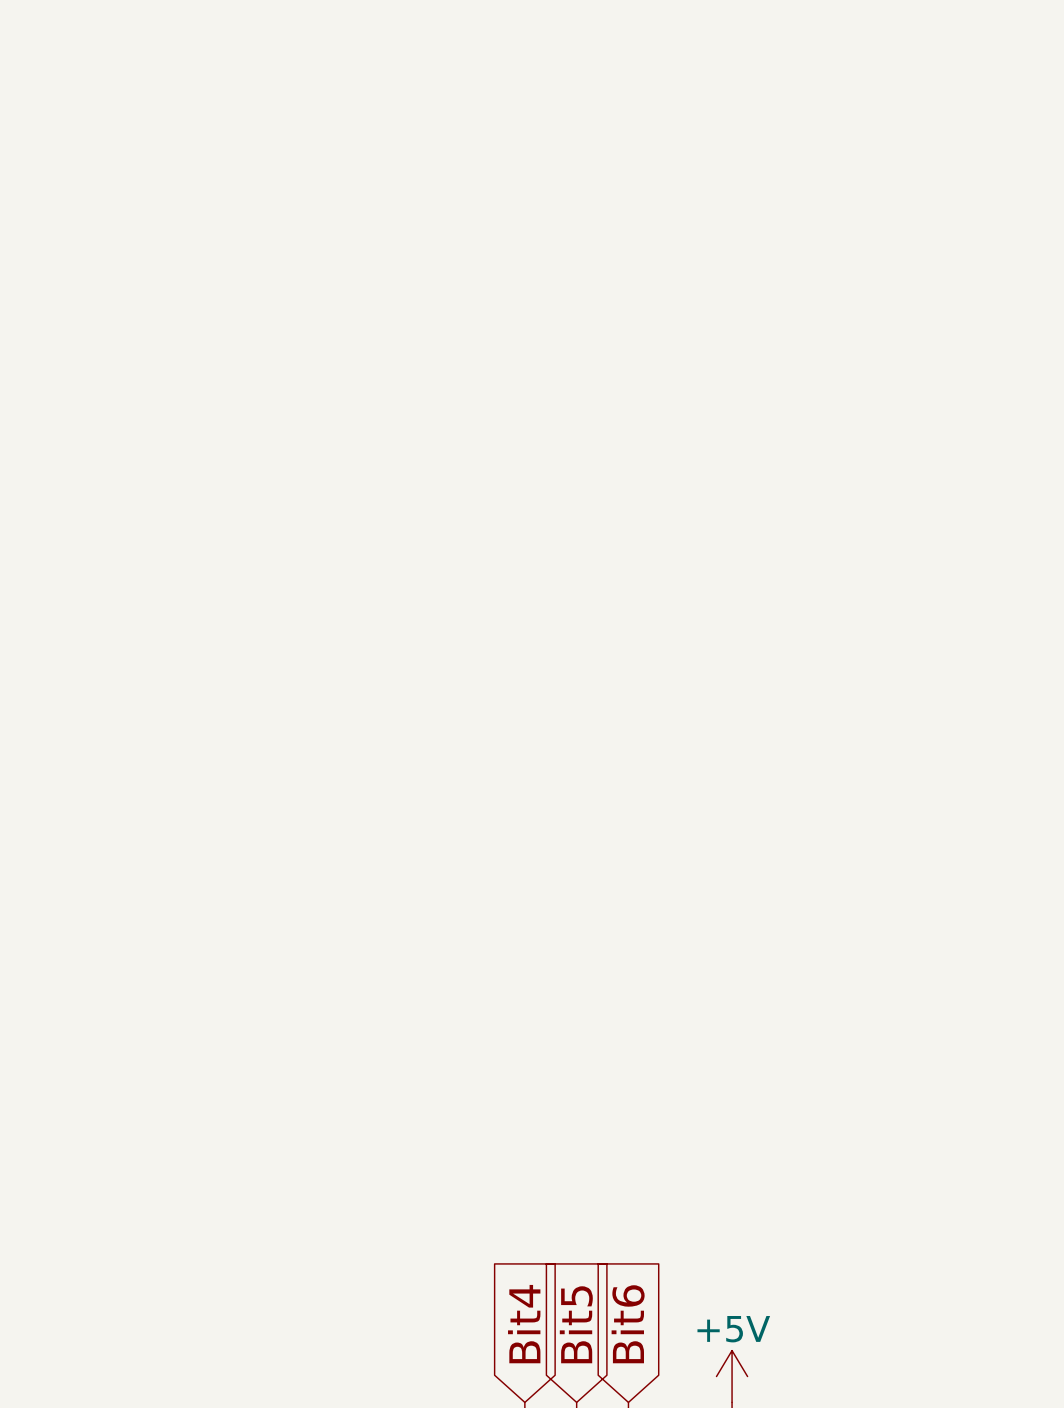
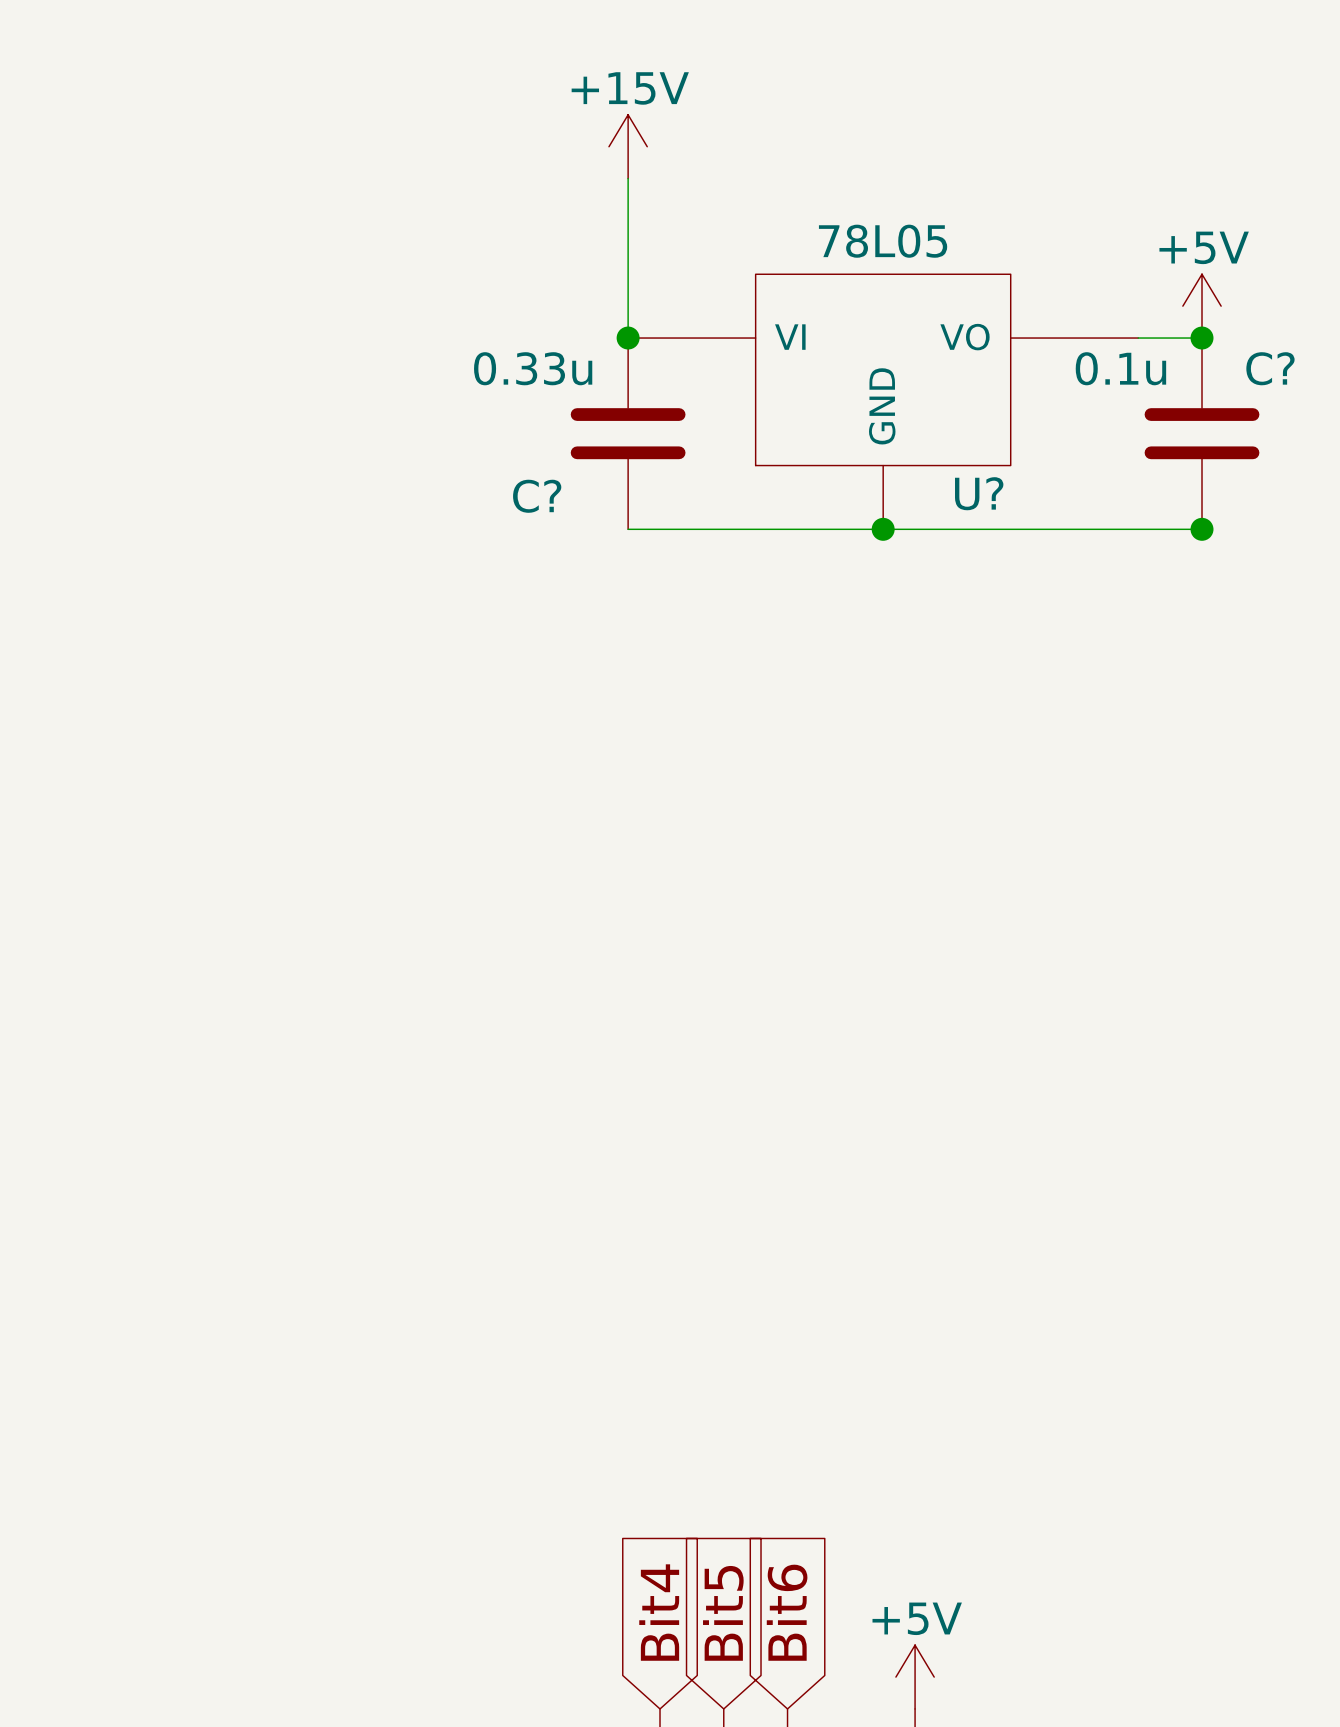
power symbol: none -> +15V (628, 146)
wire: none -> (628, 178) (628, 338)
power symbol: none -> +5V (1202, 306)
junction: none -> (628, 338)
wire: none -> (1138, 338) (1202, 338)
junction: none -> (1202, 338)
U?: none -> 78L05 (883, 401)
C?: none -> 0.33u (628, 433)
C?: none -> 0.1u (1202, 433)
wire: none -> (628, 529) (1202, 529)
junction: none -> (883, 529)
junction: none -> (1202, 529)

